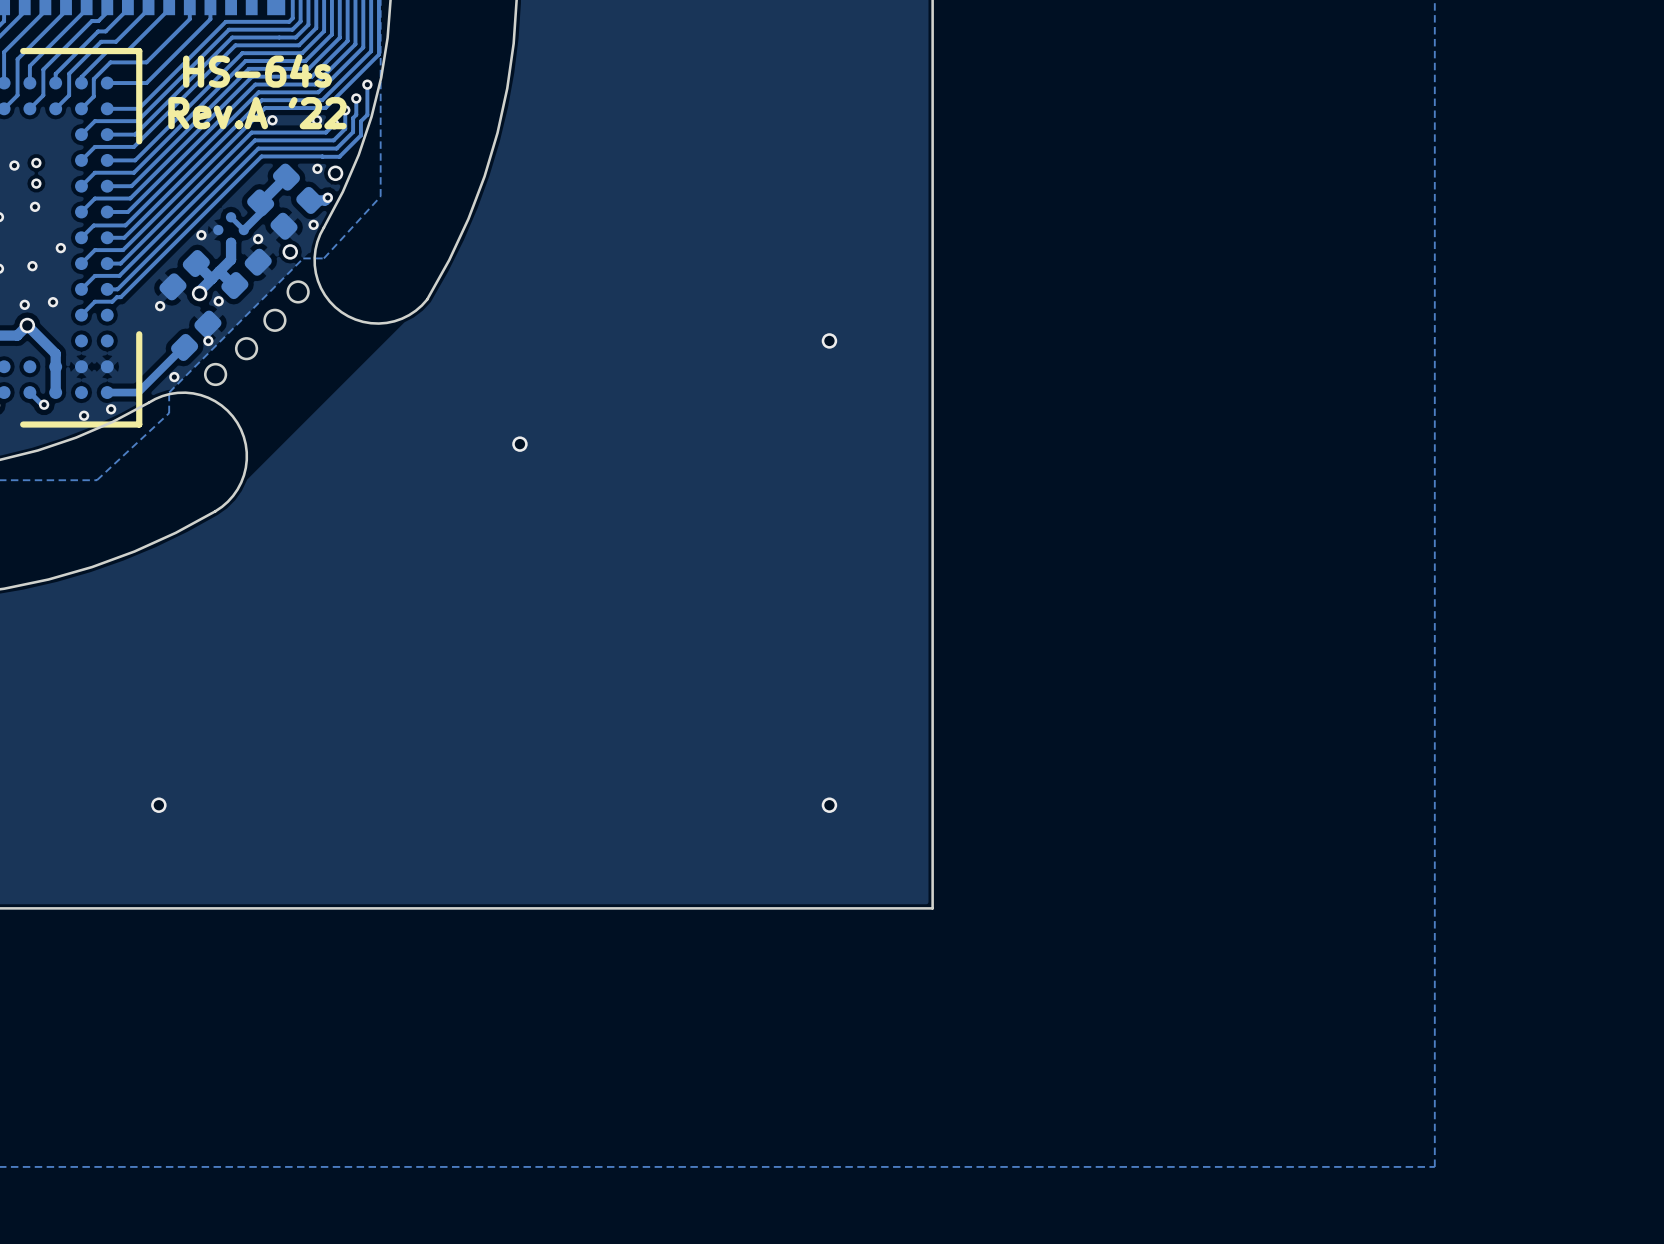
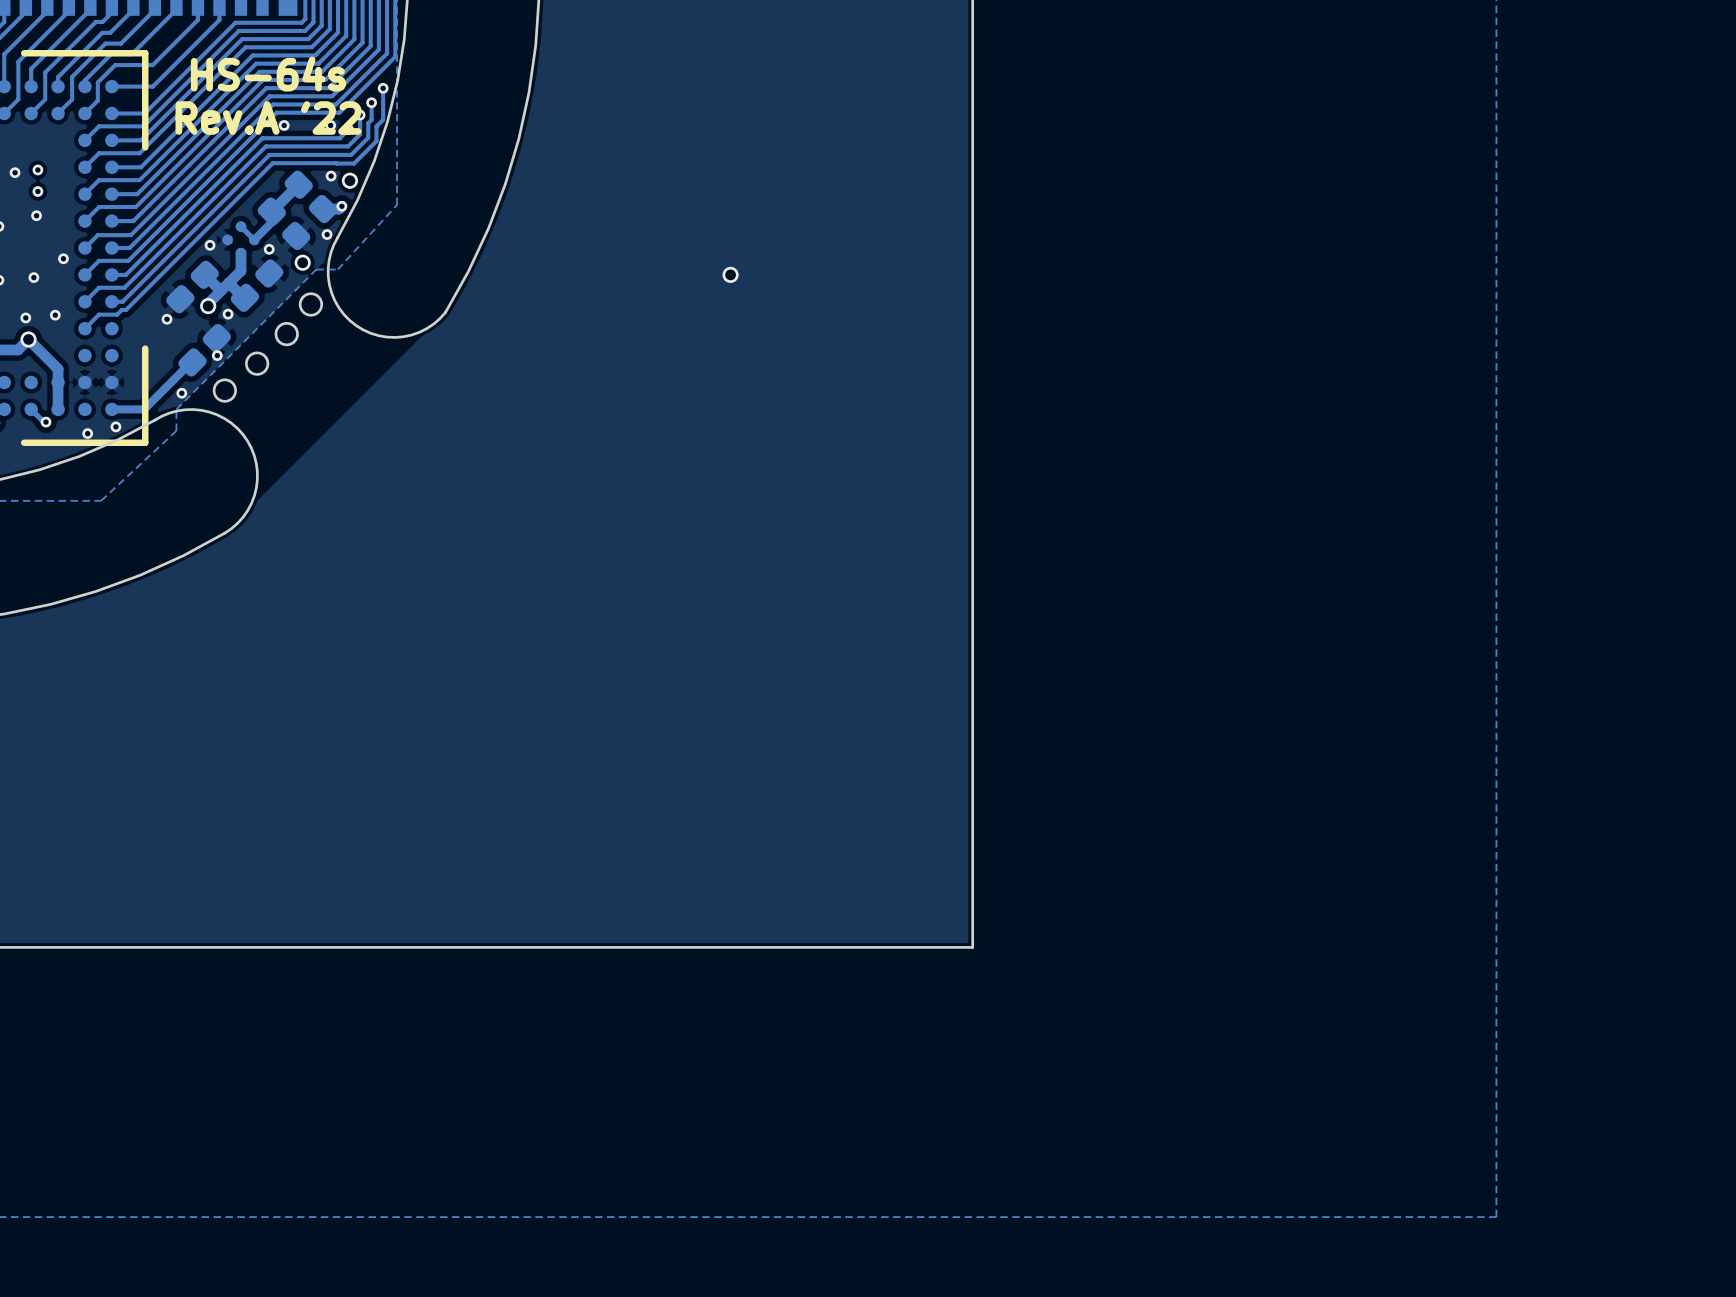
via: none -> (730, 274)
via: (829, 340) -> none
via: (519, 444) -> none
via: (158, 805) -> none
via: (829, 805) -> none

